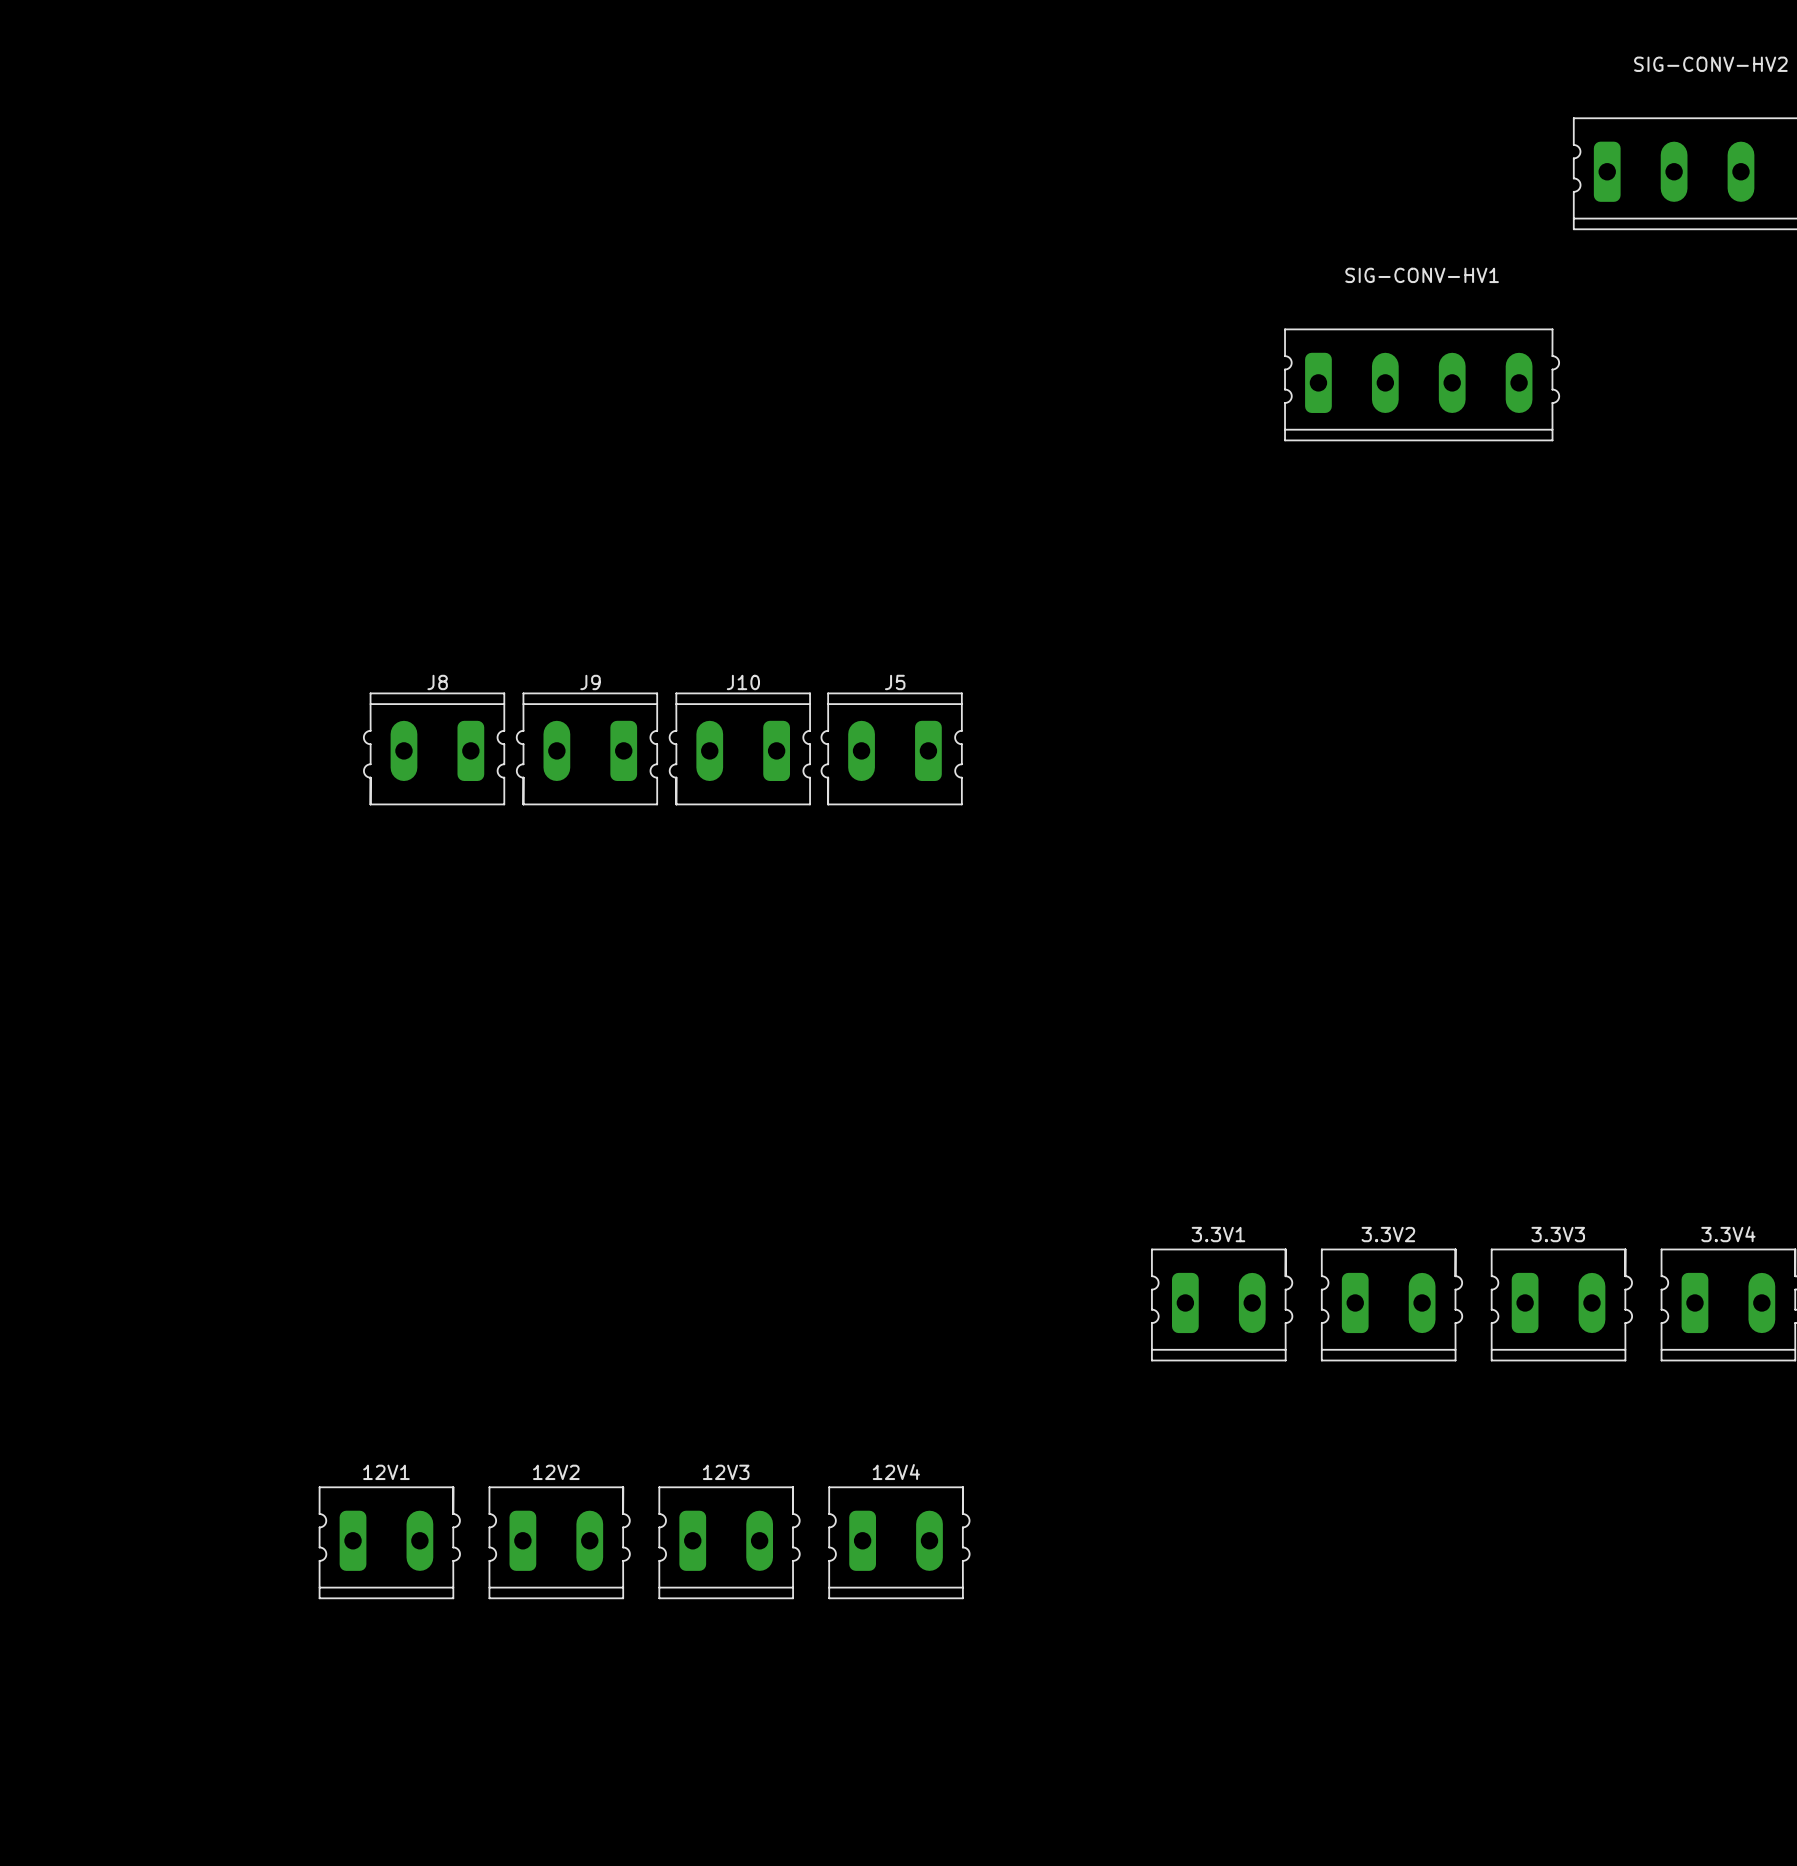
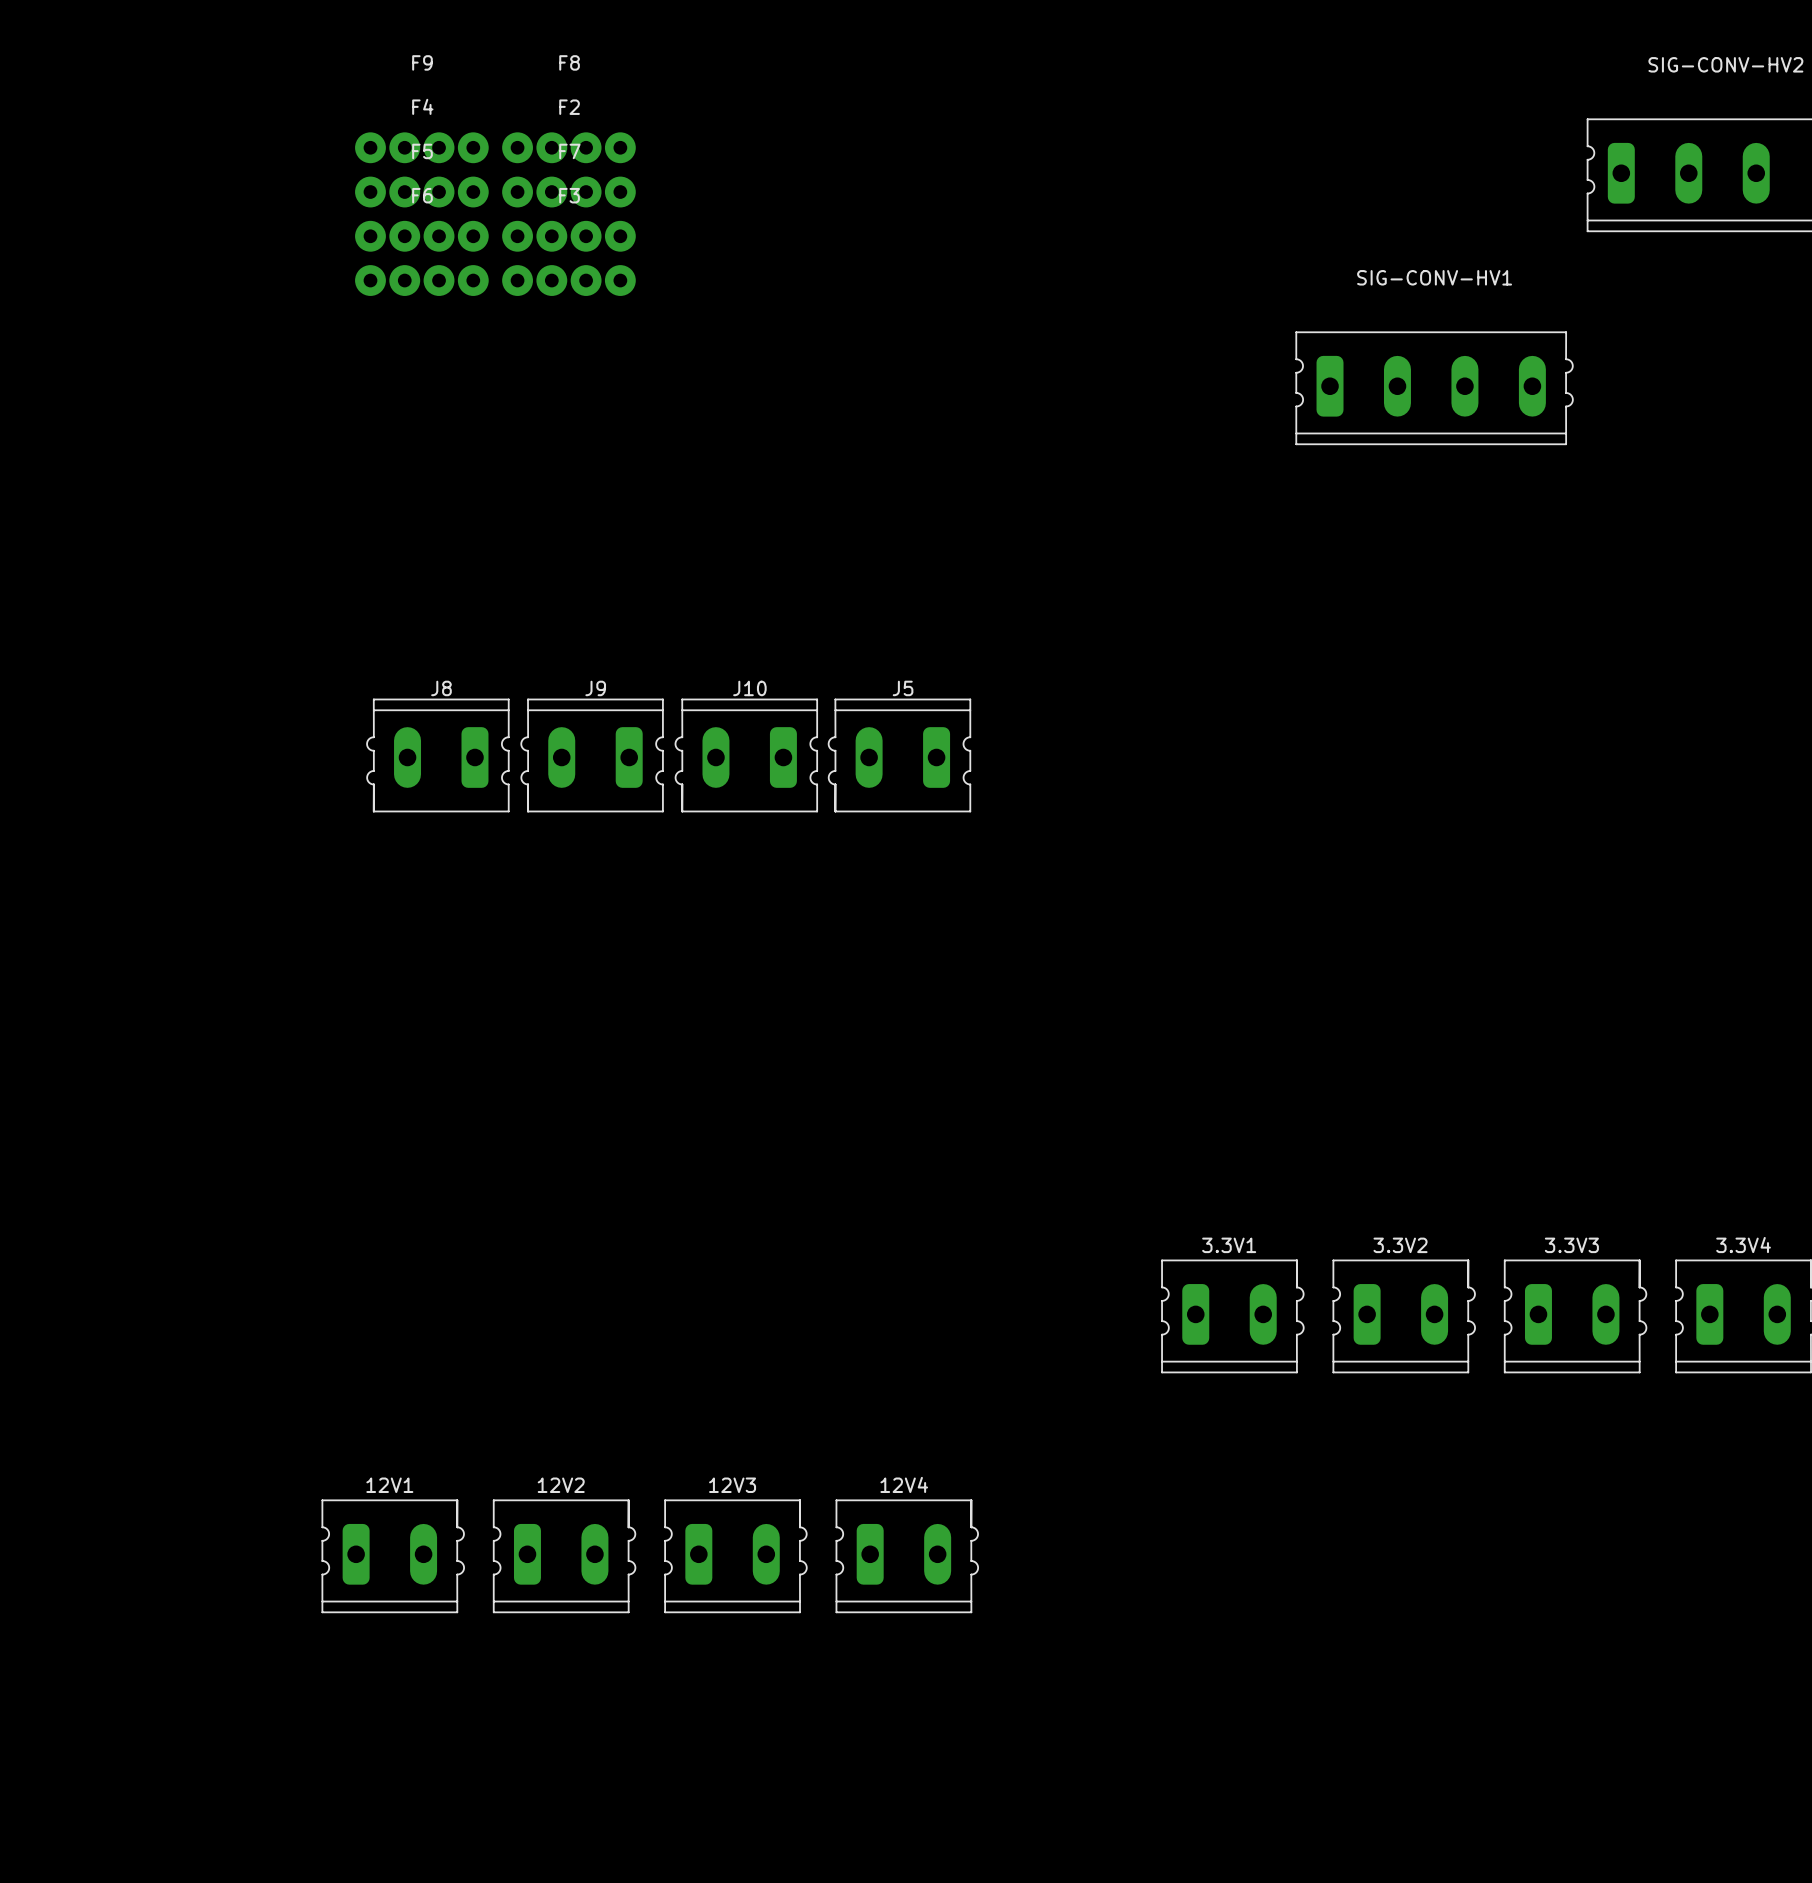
F9: none -> (421, 147)
F8: none -> (568, 147)
F4: none -> (421, 192)
F2: none -> (568, 192)
F5: none -> (421, 236)
F7: none -> (568, 236)
F6: none -> (421, 280)
F3: none -> (568, 280)

